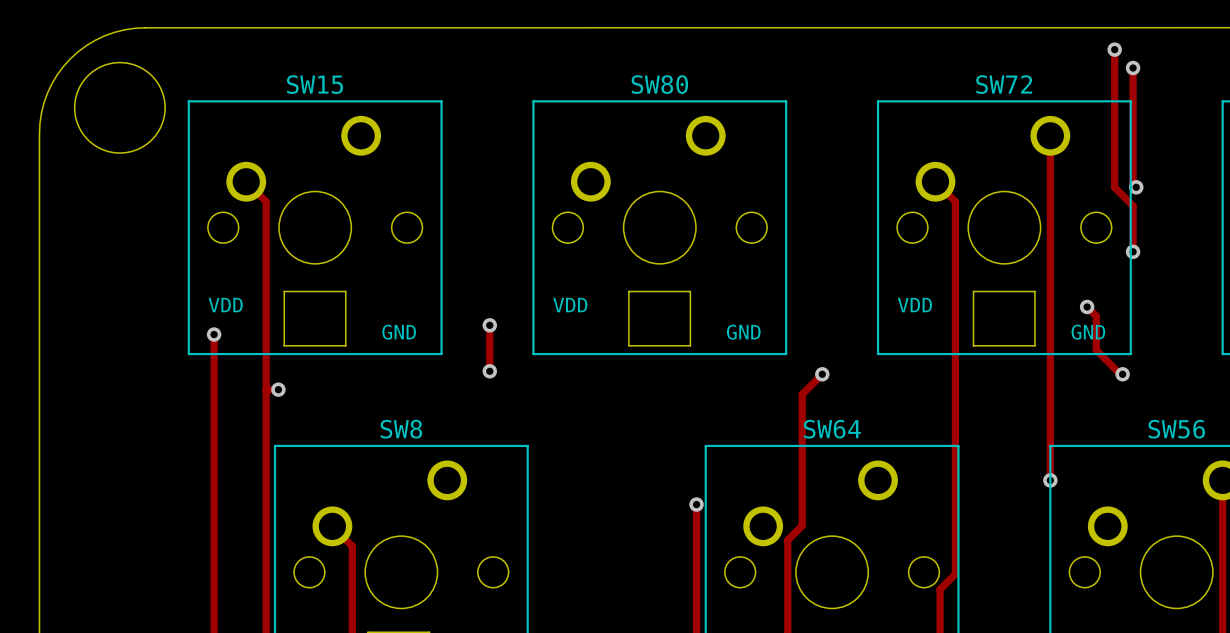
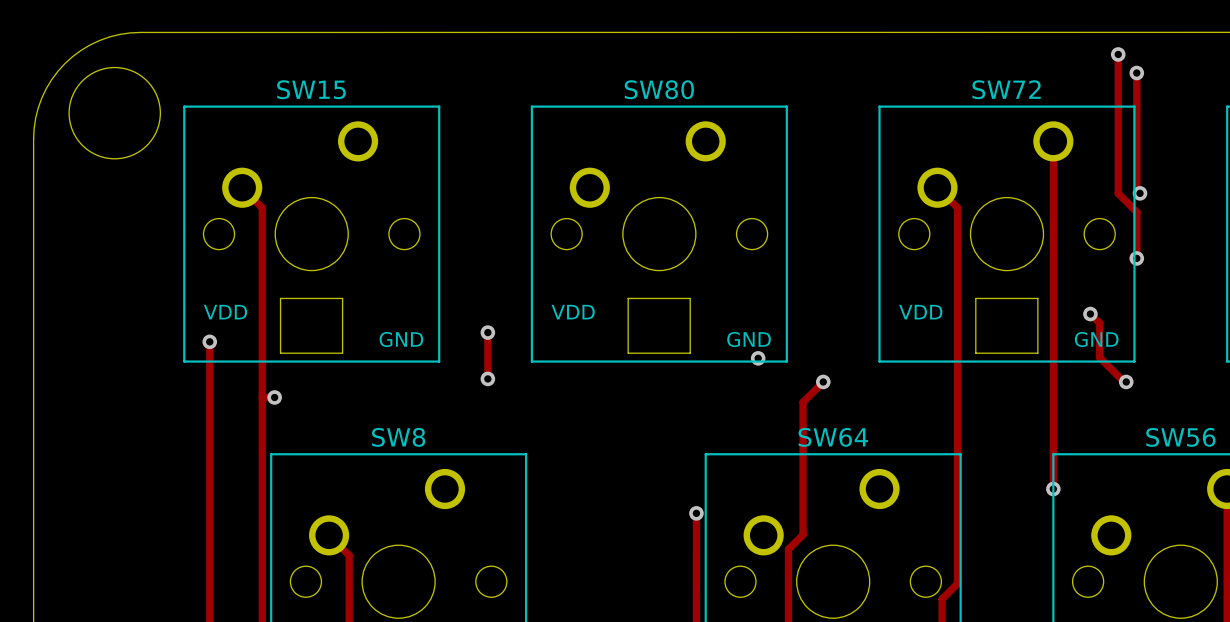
via: none -> (758, 358)

